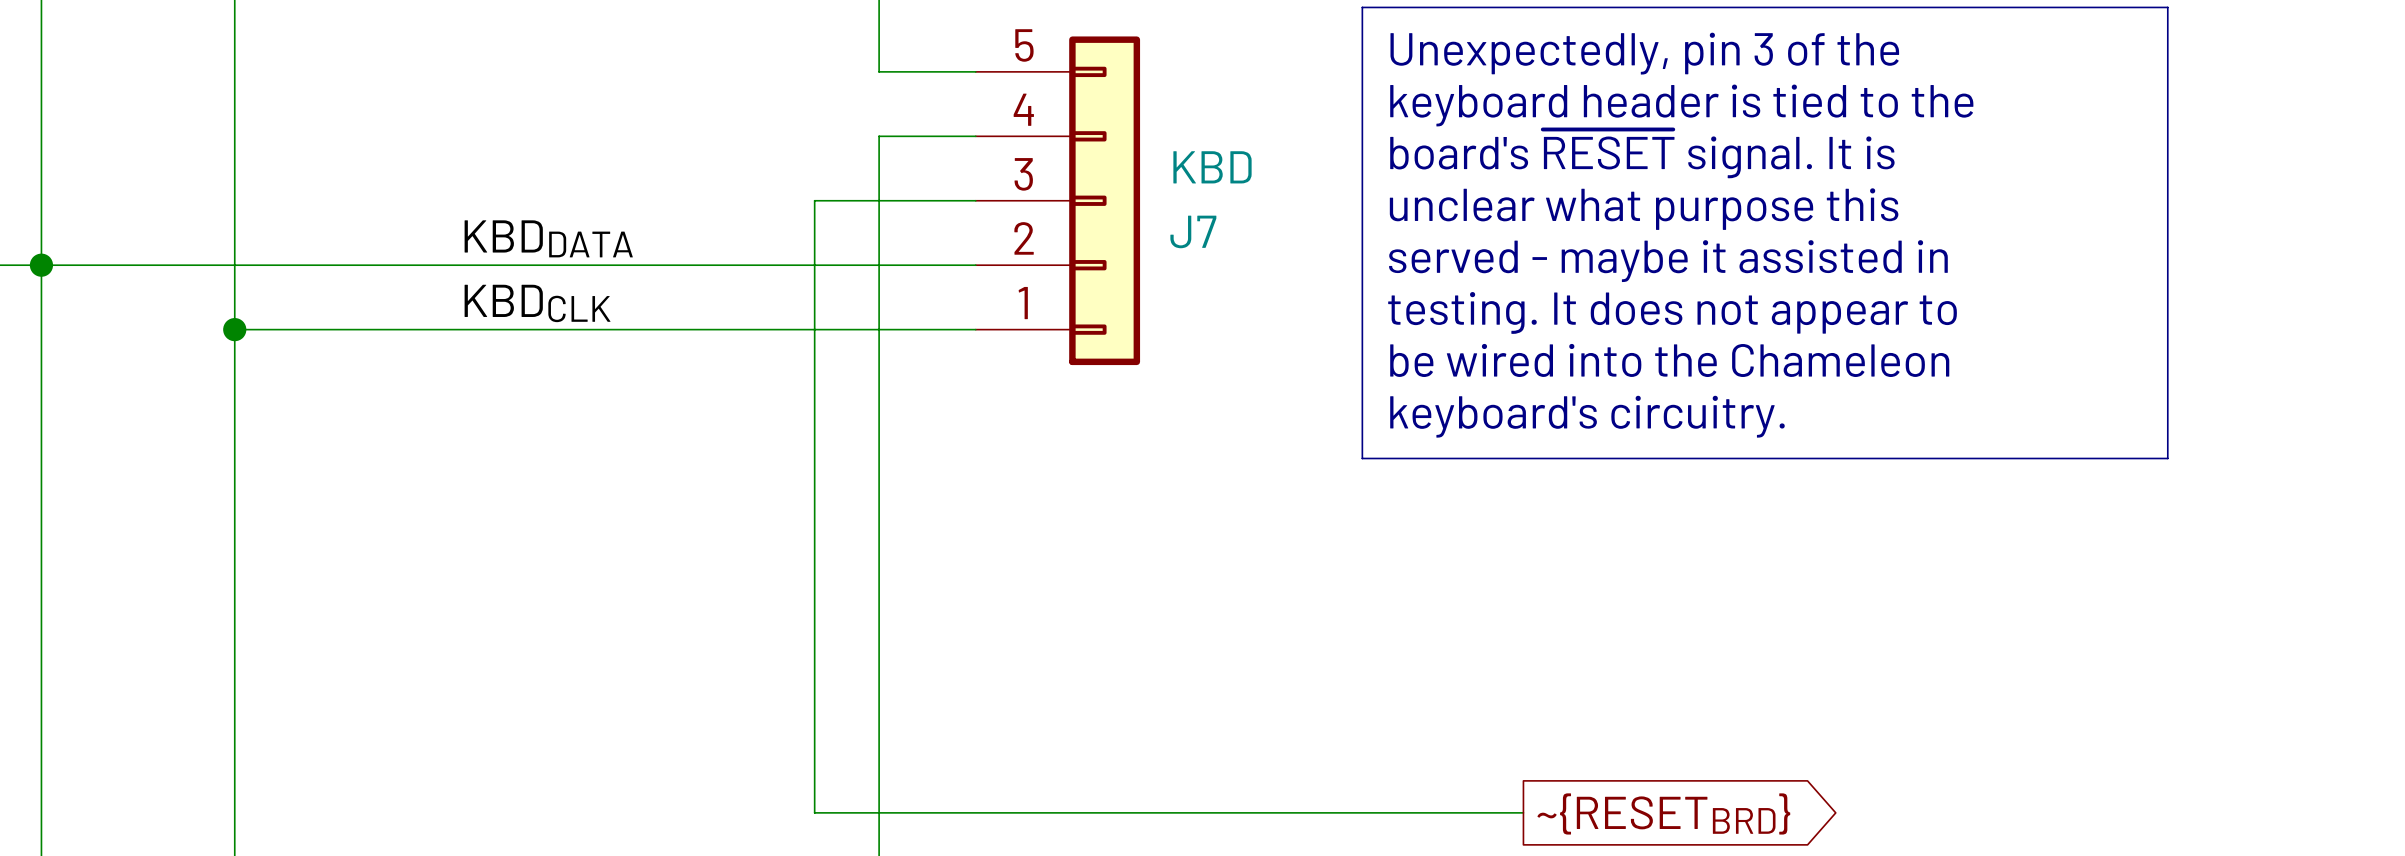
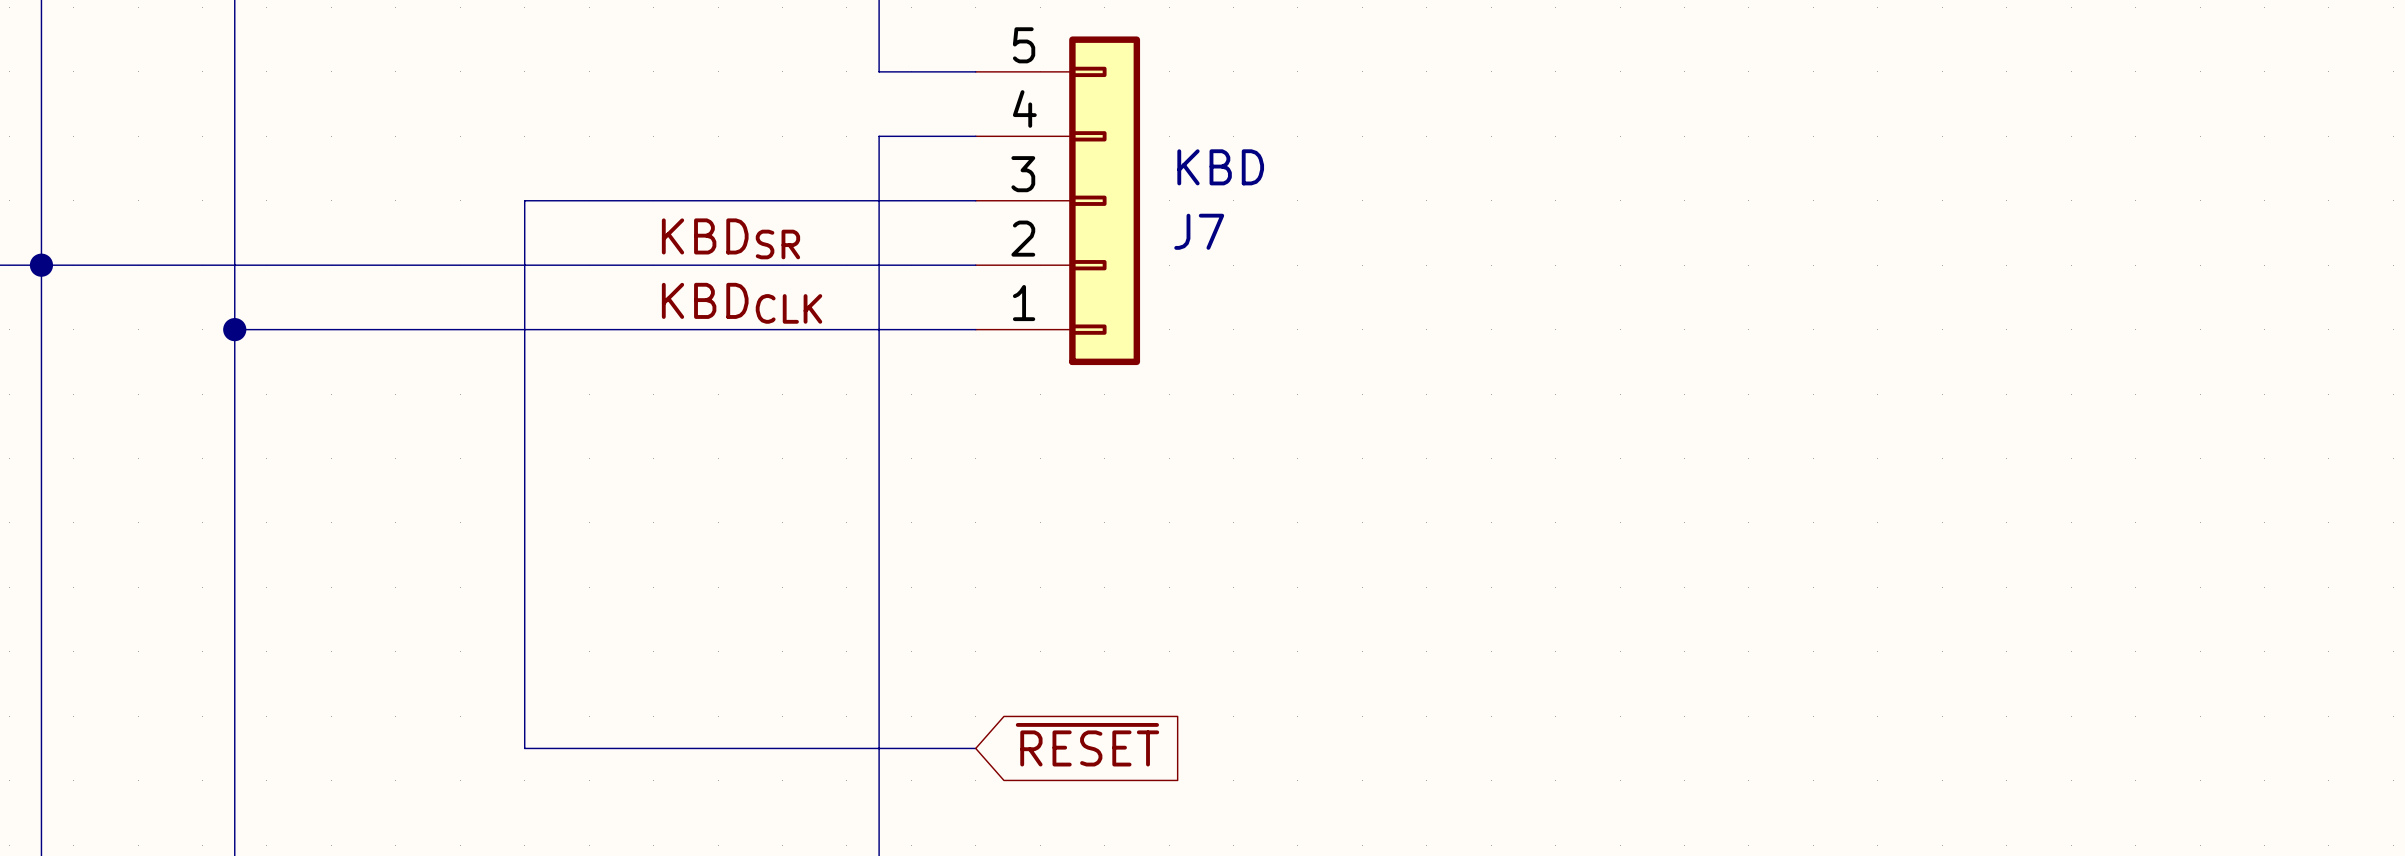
line: (1362, 7) (2167, 7) (2167, 458) (1362, 458) (1362, 7) -> none
text: Unexpectedly, pin 3 of the (1644, 53) -> none
text: keyboard header is tied to the (1681, 105) -> none
text: board's ~{RESET} signal. It is (1642, 153) -> none
wire: (814, 200) (814, 812) (1523, 812) -> (814, 200) (524, 200) (524, 748) (975, 748)
text: unclear what purpose this (1644, 209) -> none
label: KBDDATA (548, 238) -> KBDSR (730, 238)
text: served - maybe it assisted in (1668, 261) -> none
label position: KBDCLK (537, 303) -> KBDCLK (742, 303)
text: testing. It does not appear to (1672, 312) -> none
text: be wired into the Chameleon (1669, 360) -> none
text: keyboard's circuitry. (1587, 416) -> none
global label: none -> ~{RESET} (1087, 744)
global label: ~{RESETBRD} (1663, 813) -> none

